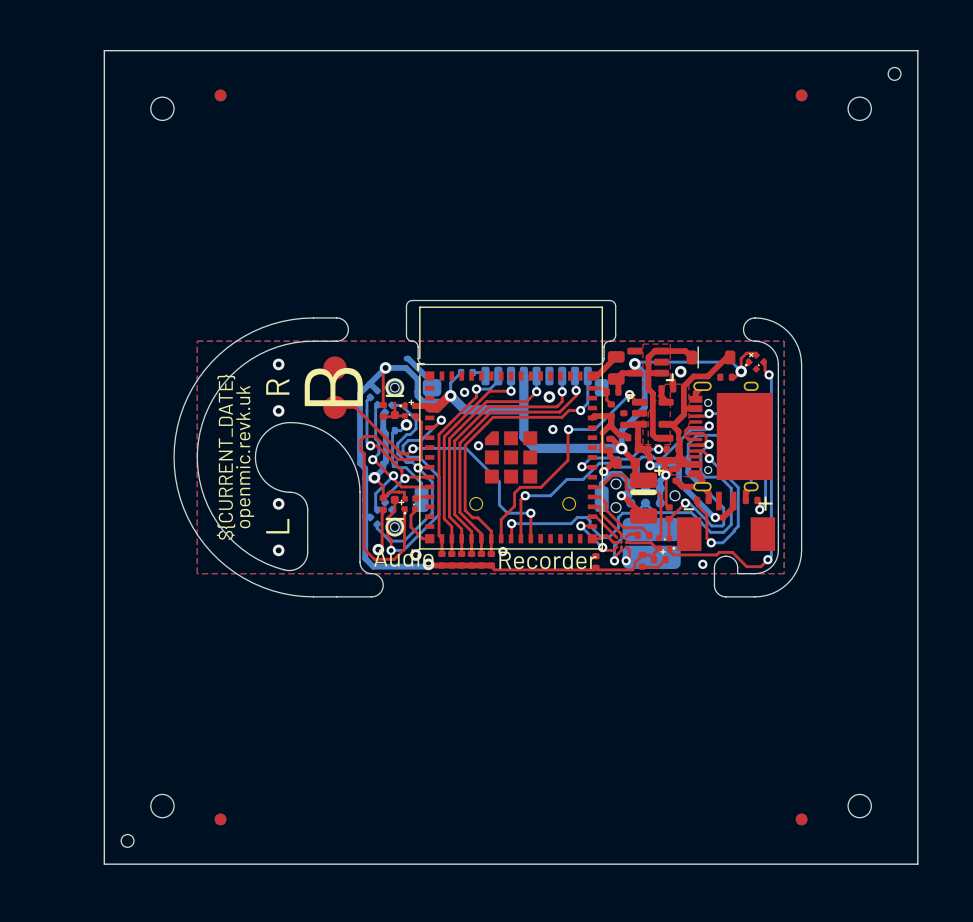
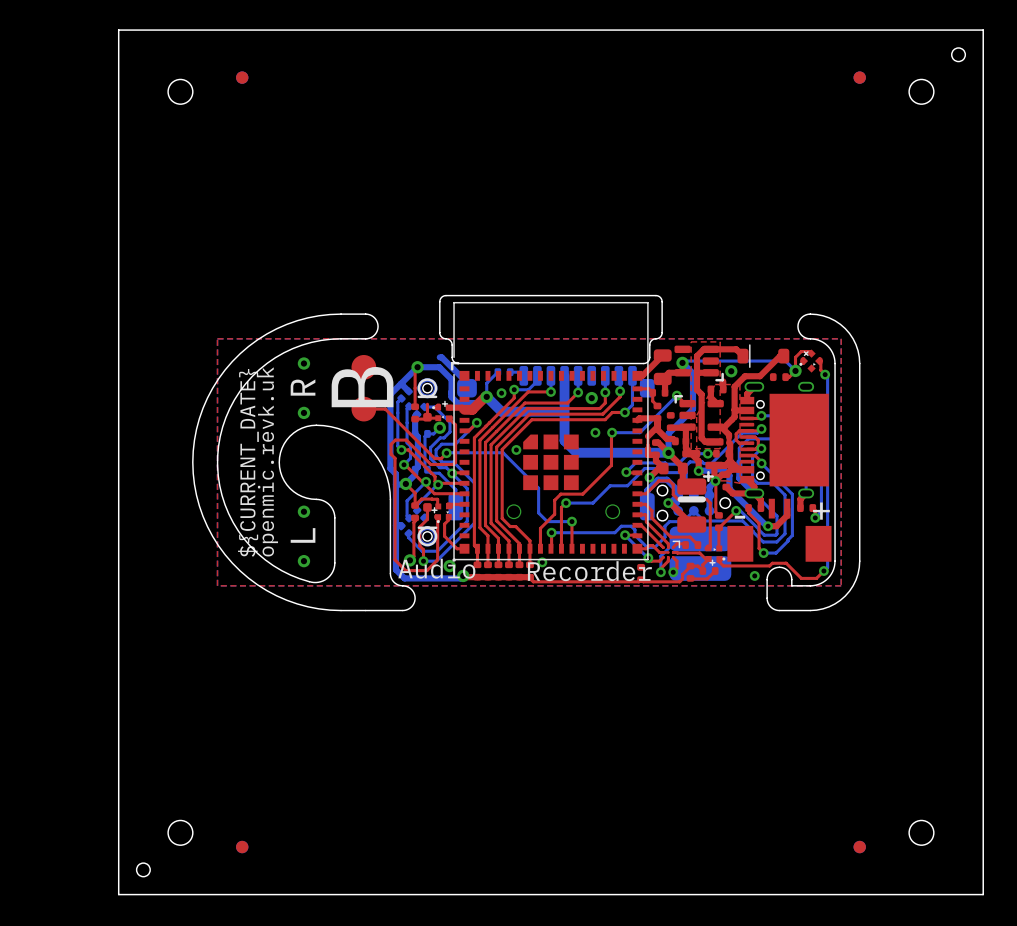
part footprint: [611, 532, 632, 552] -> [658, 540, 681, 563]

